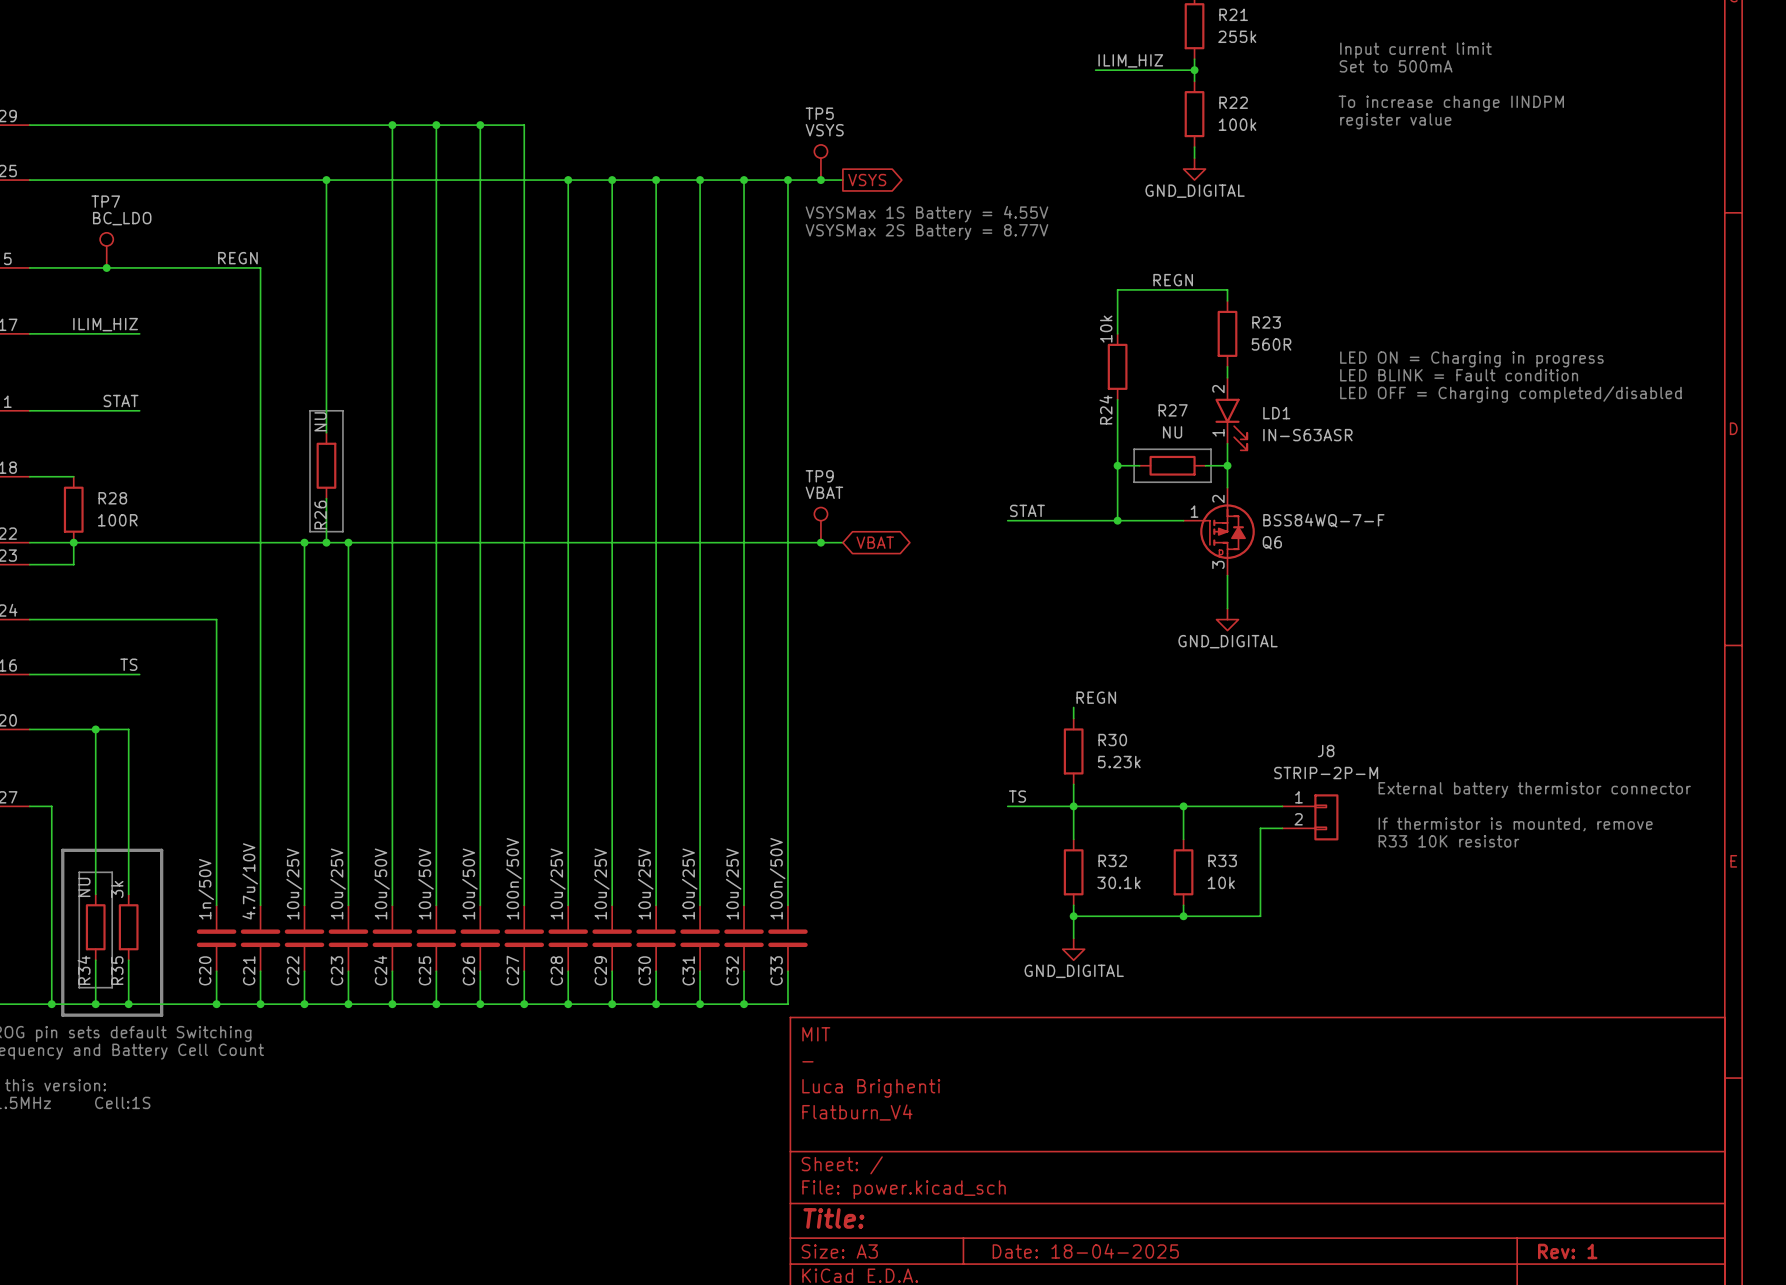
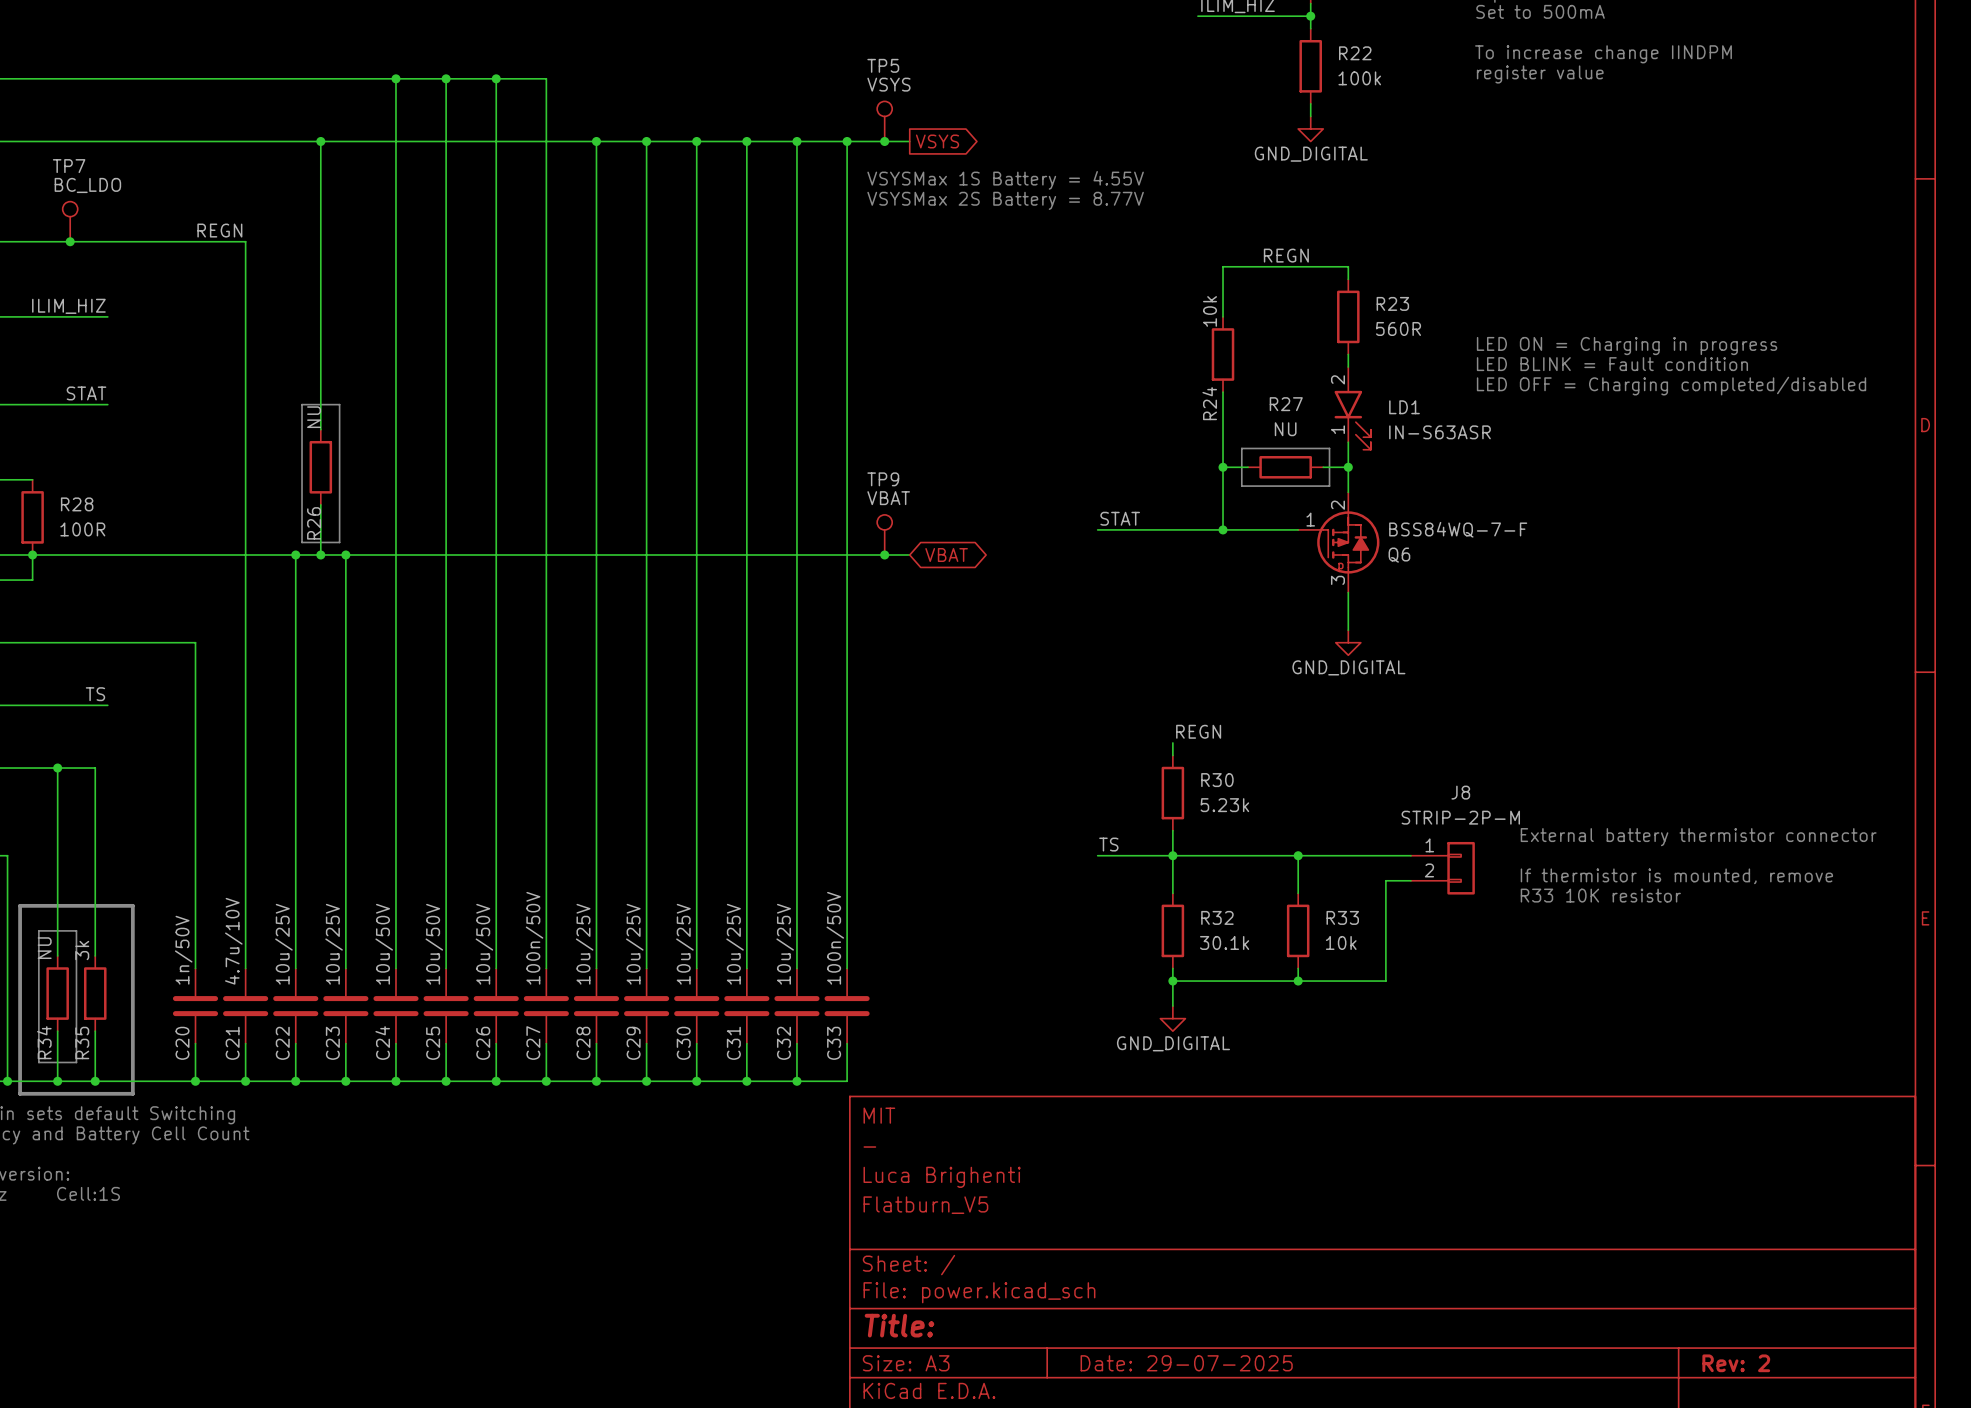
title block: Flatburn_V4 (857, 1112) -> Flatburn_V5 (925, 1205)
title block: Date: 18-04-2025 (1085, 1251) -> Date: 29-07-2025 (1186, 1363)
title block: Rev: 1 (1567, 1251) -> Rev: 2 (1736, 1363)

